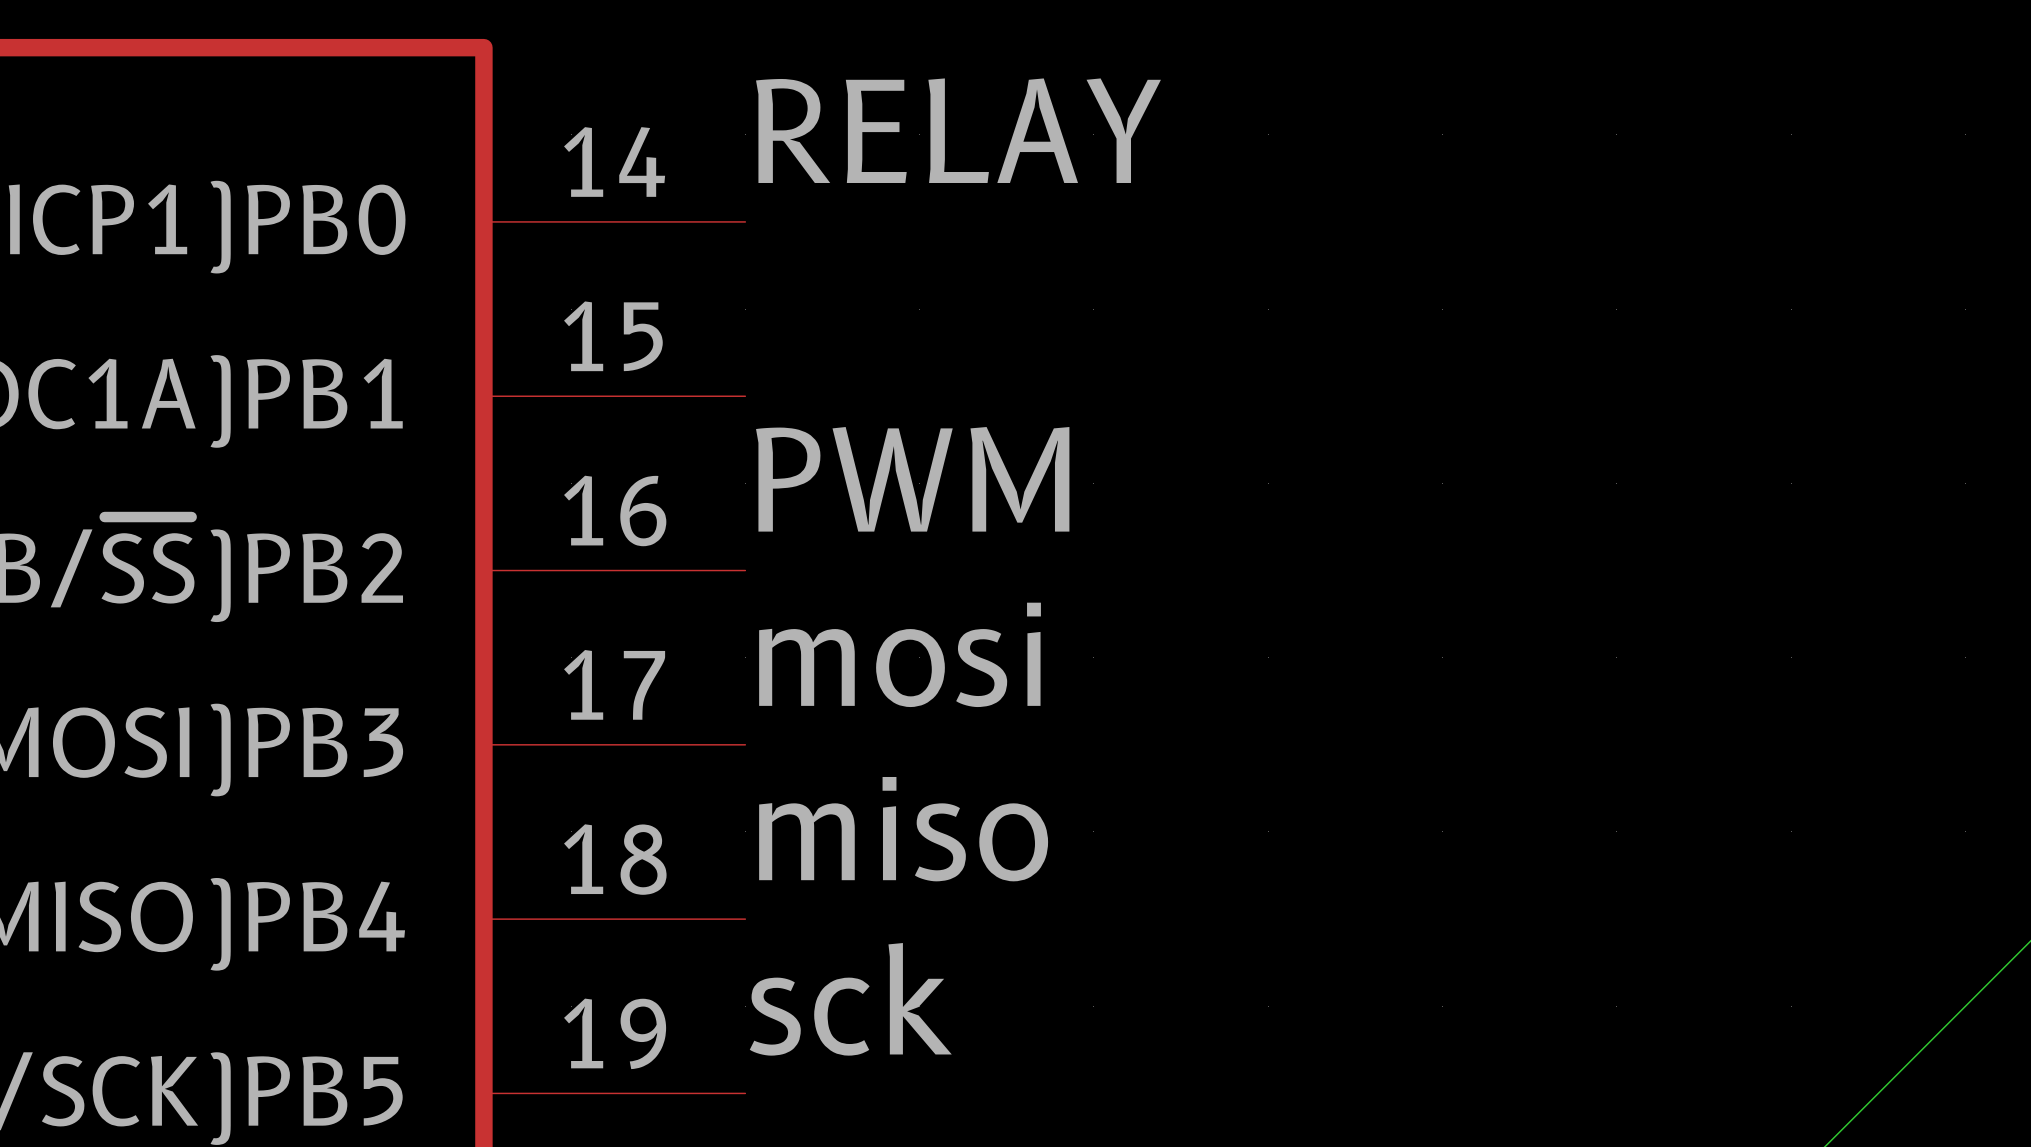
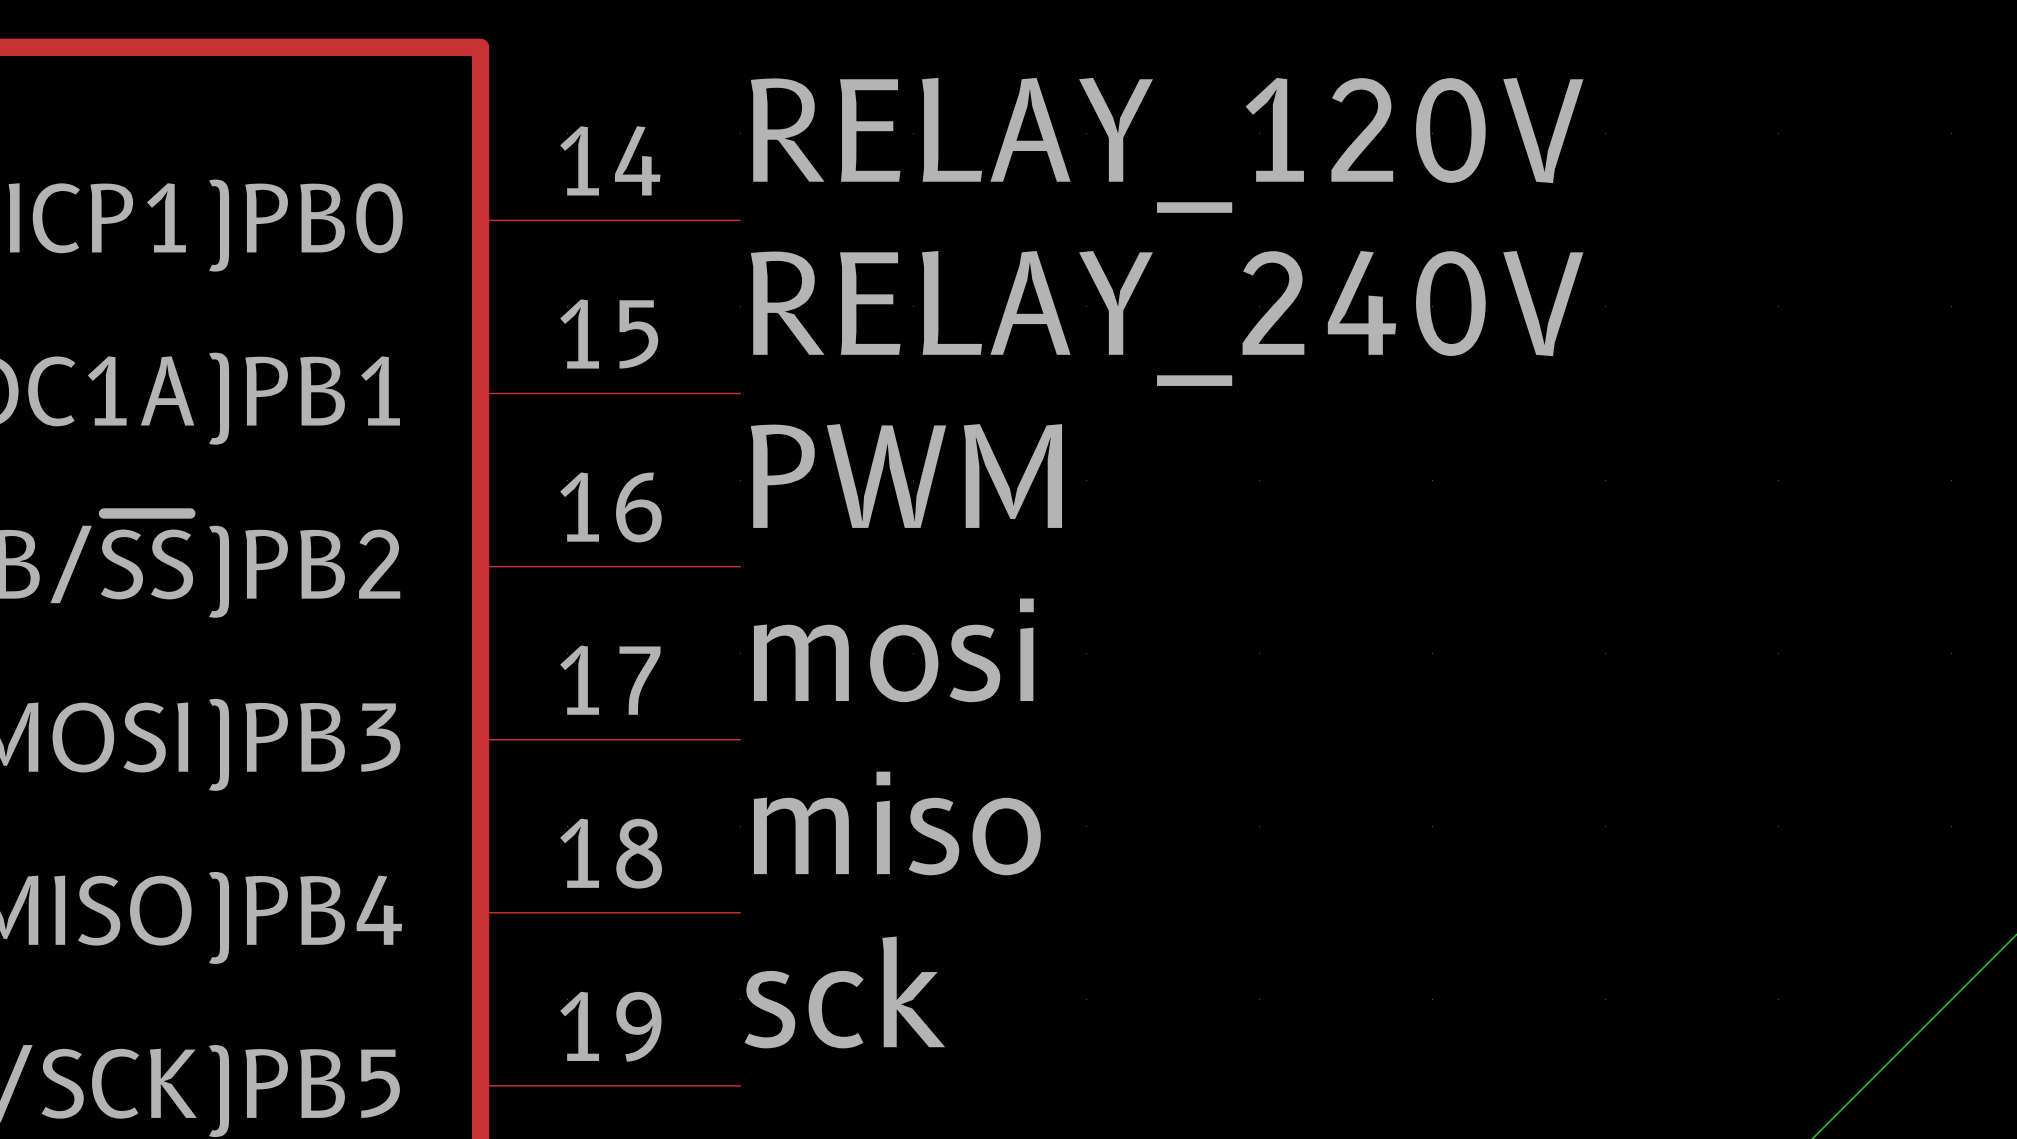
label: RELAY (958, 130) -> RELAY_120V (1167, 145)
label: none -> RELAY_240V (1167, 318)

